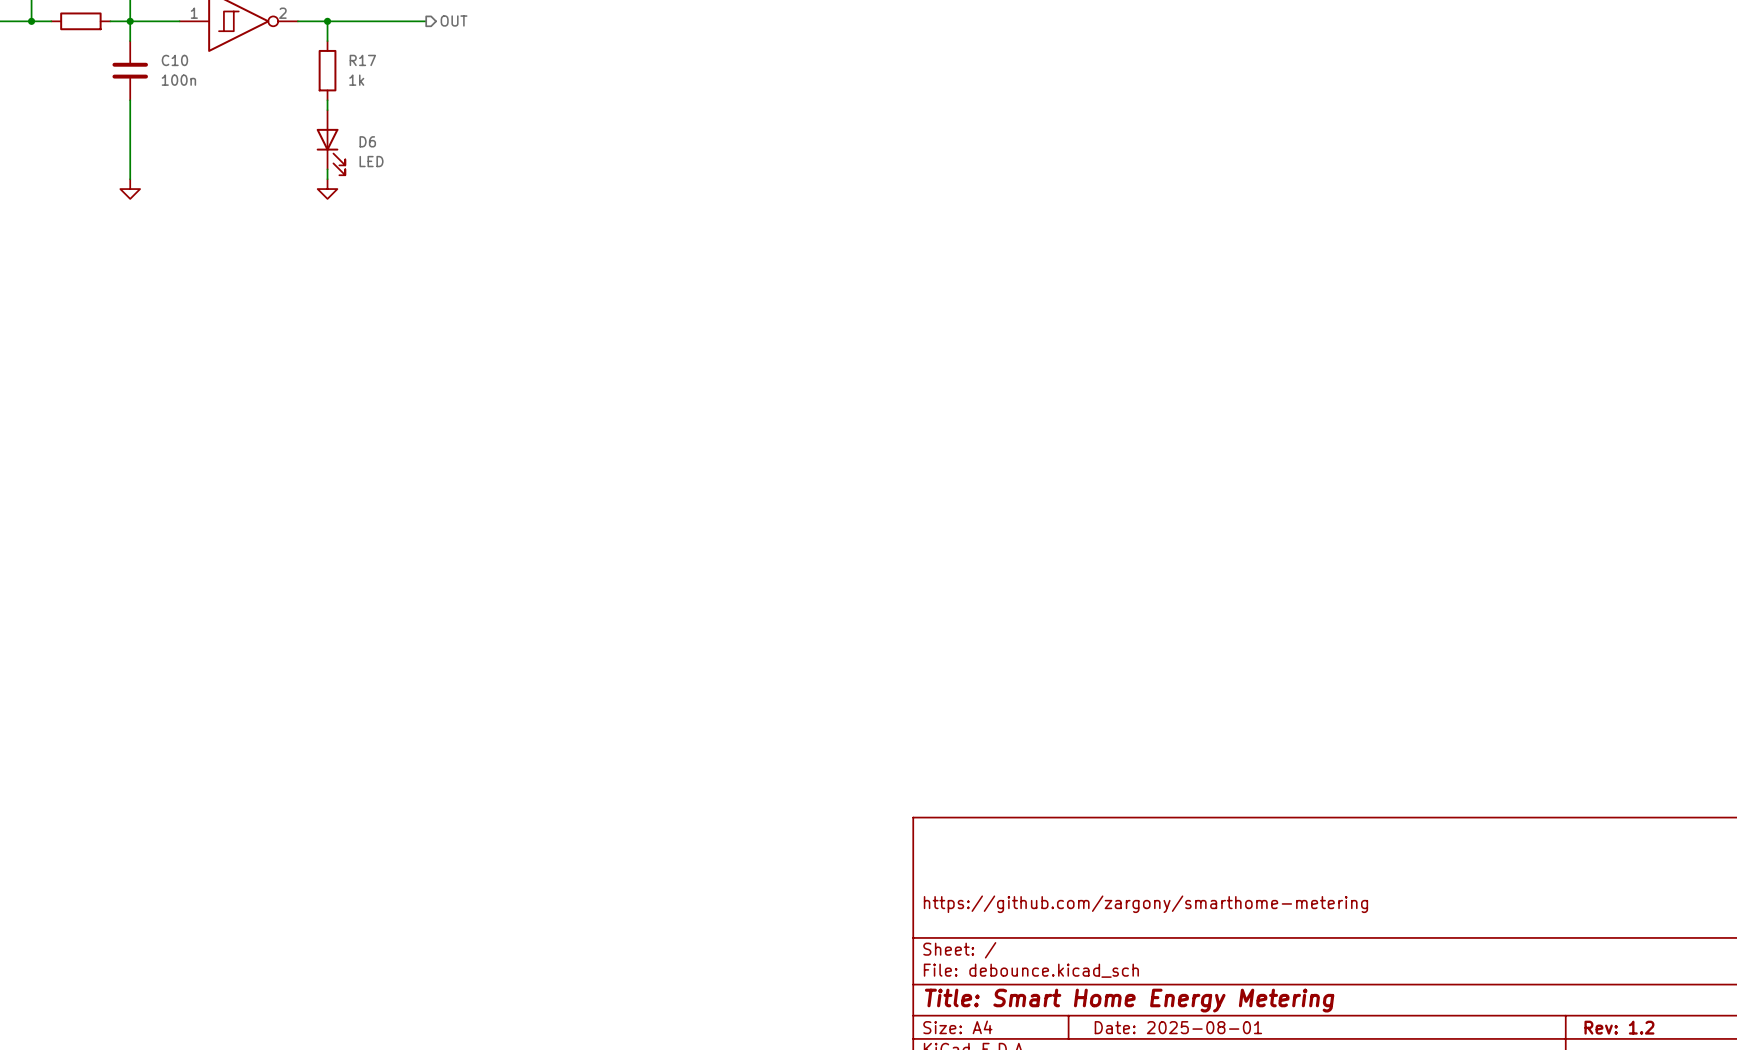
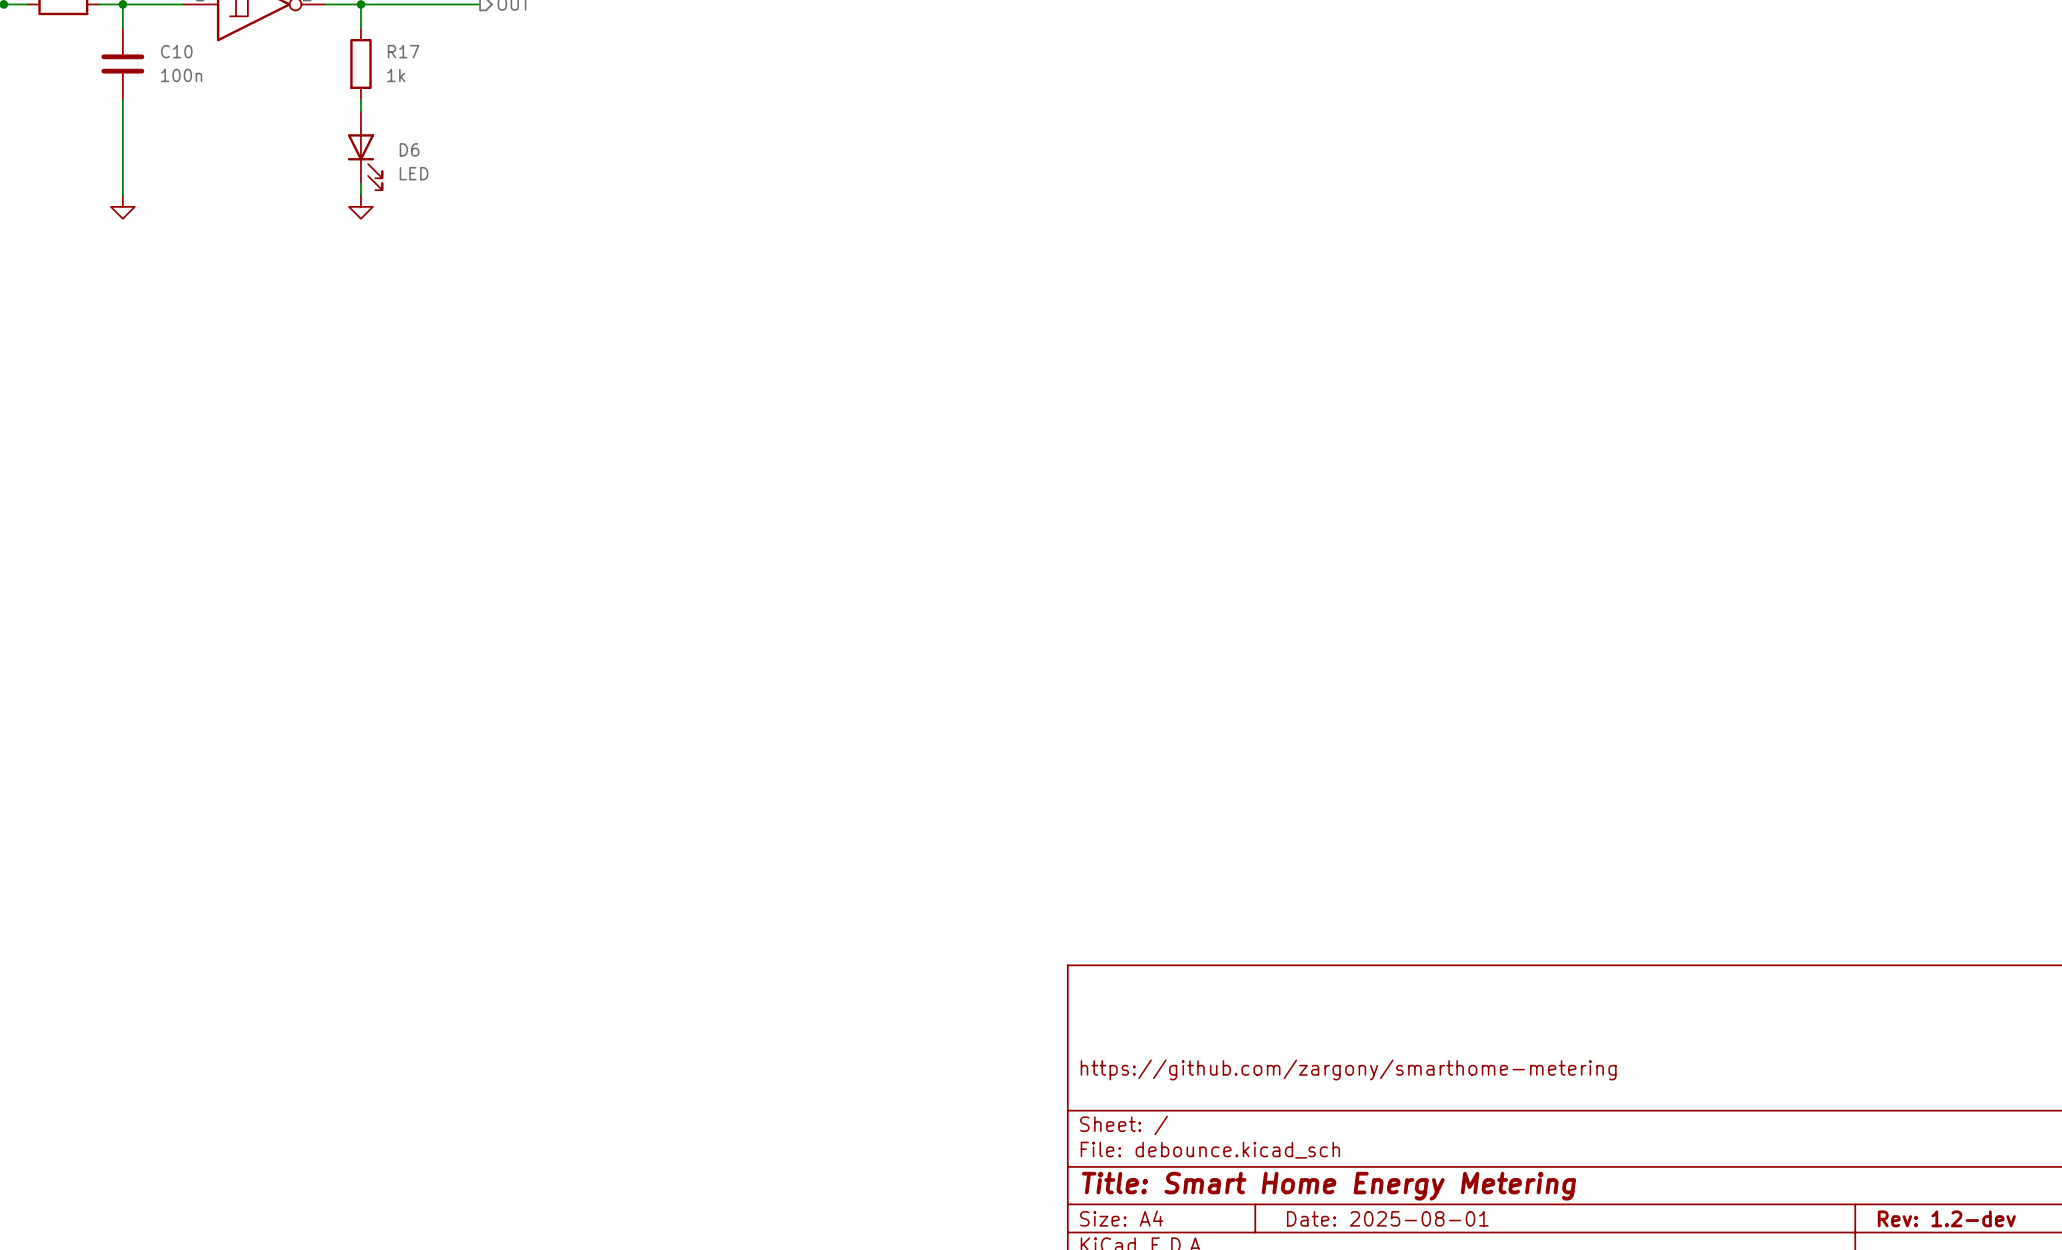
title block: Rev: 1.2 (1619, 1027) -> Rev: 1.2-dev (1946, 1218)

